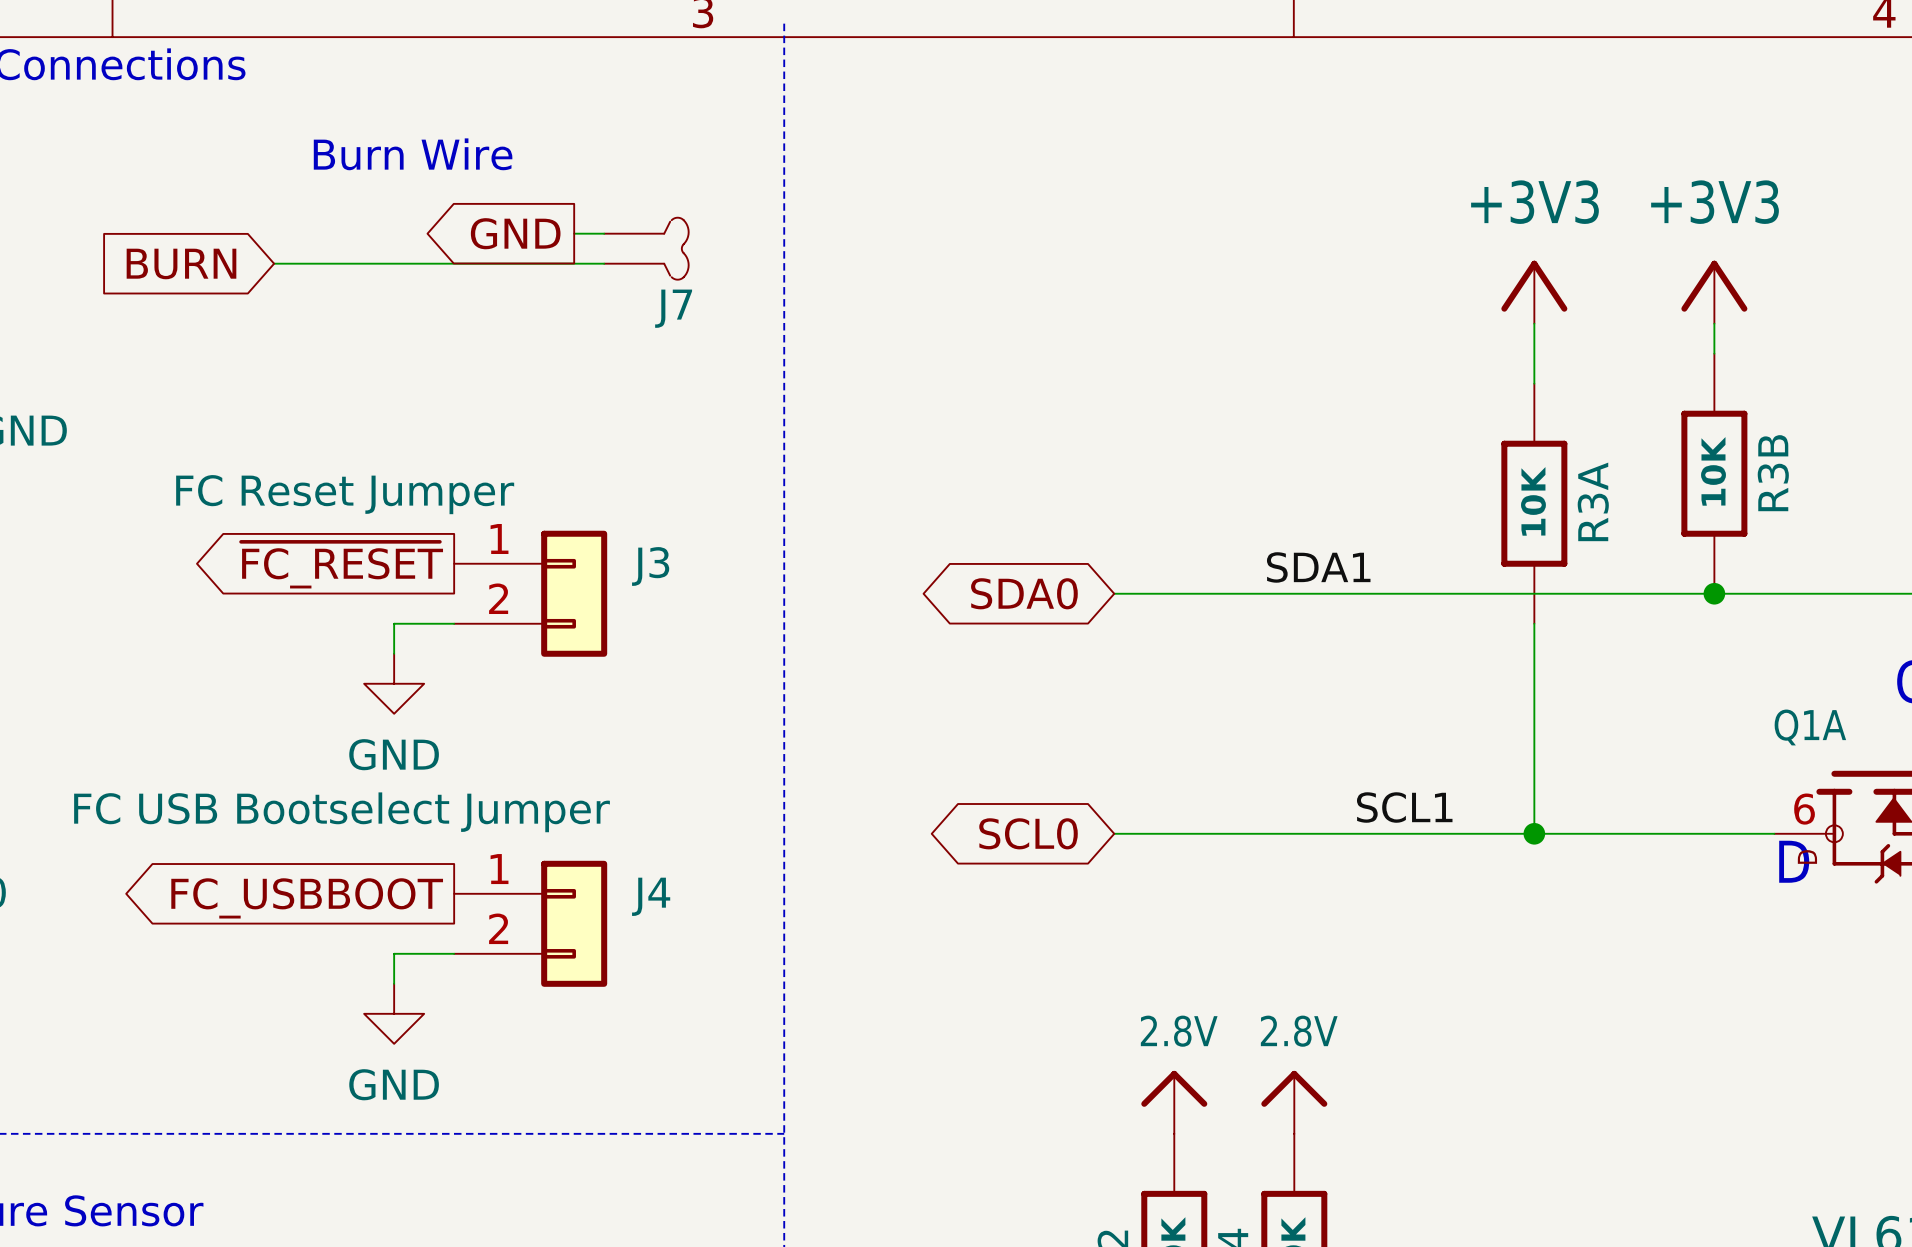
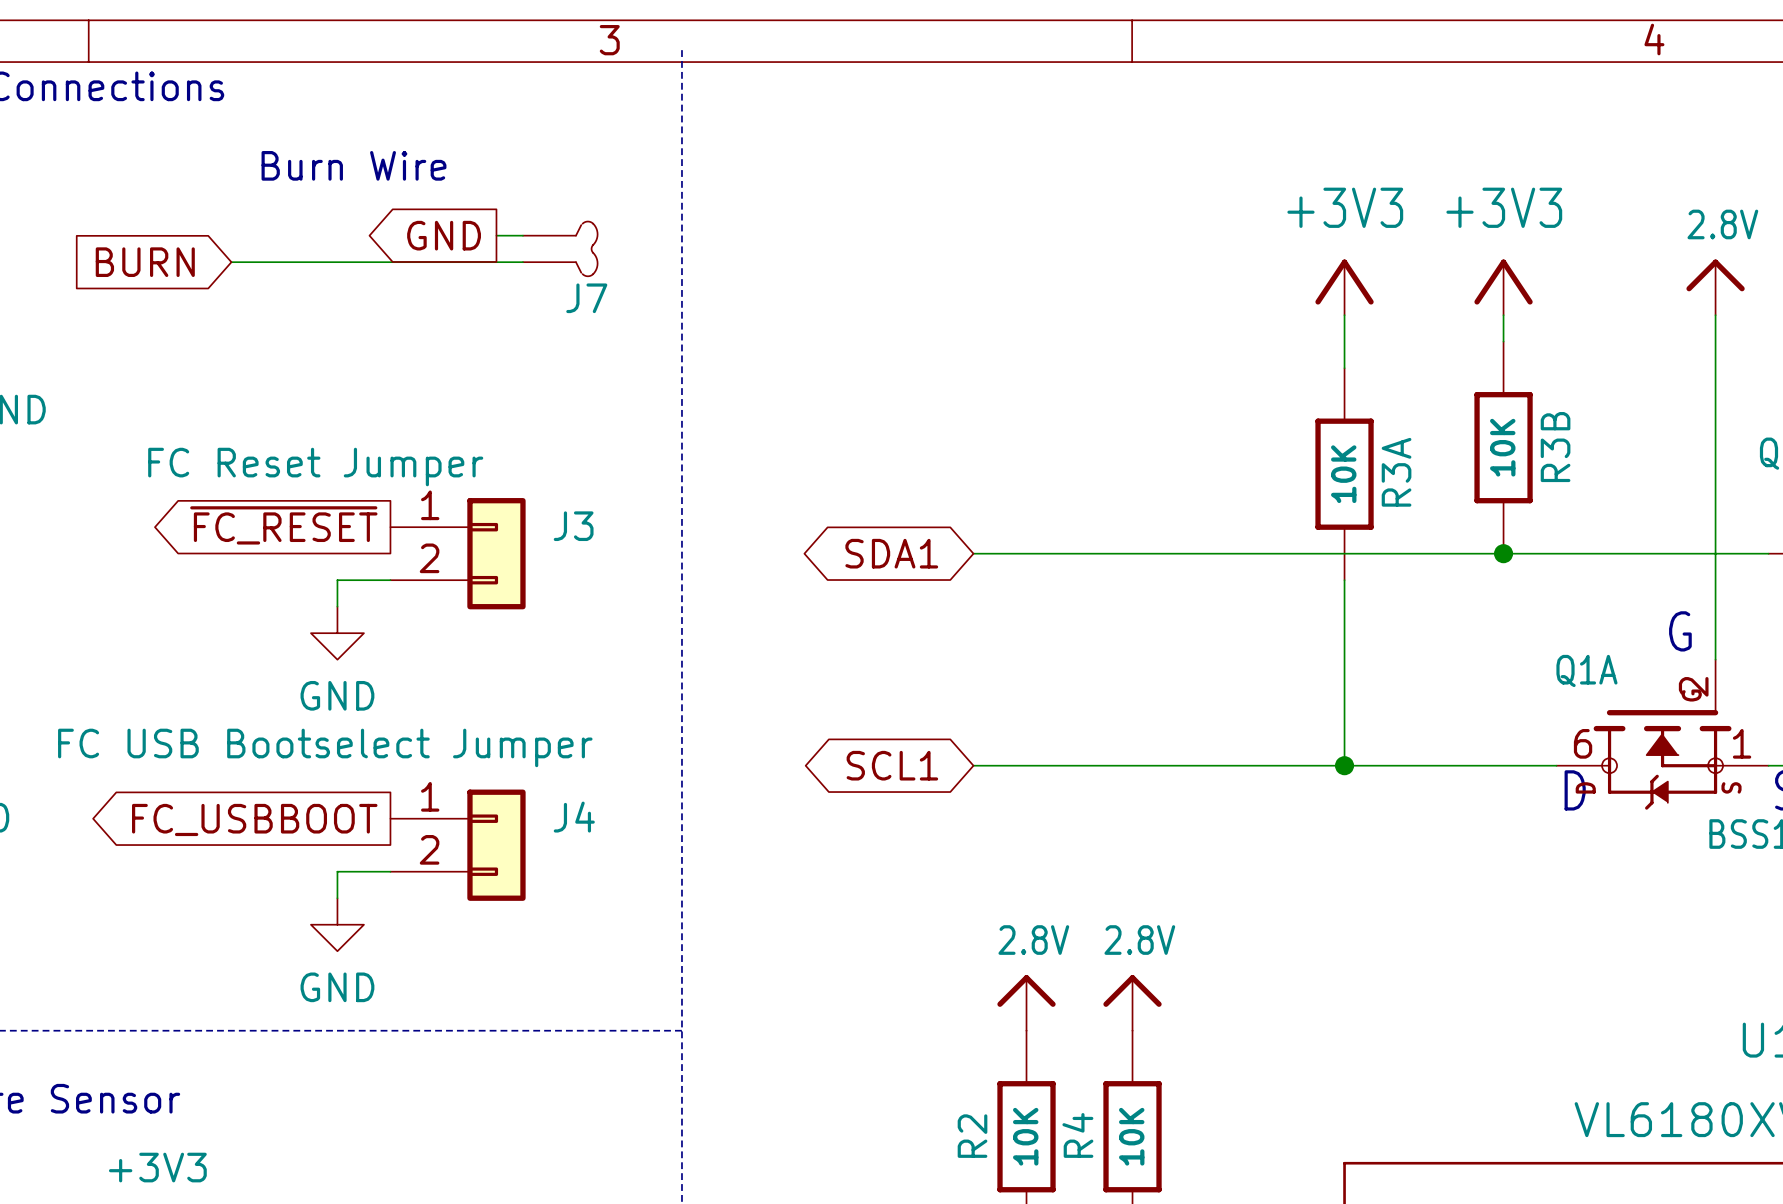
label: SDA1 (1318, 567) -> none
global label: SDA0 (1024, 593) -> SDA1 (891, 553)
label: SCL1 (1404, 807) -> none
global label: SCL0 (1028, 833) -> SCL1 (892, 765)

